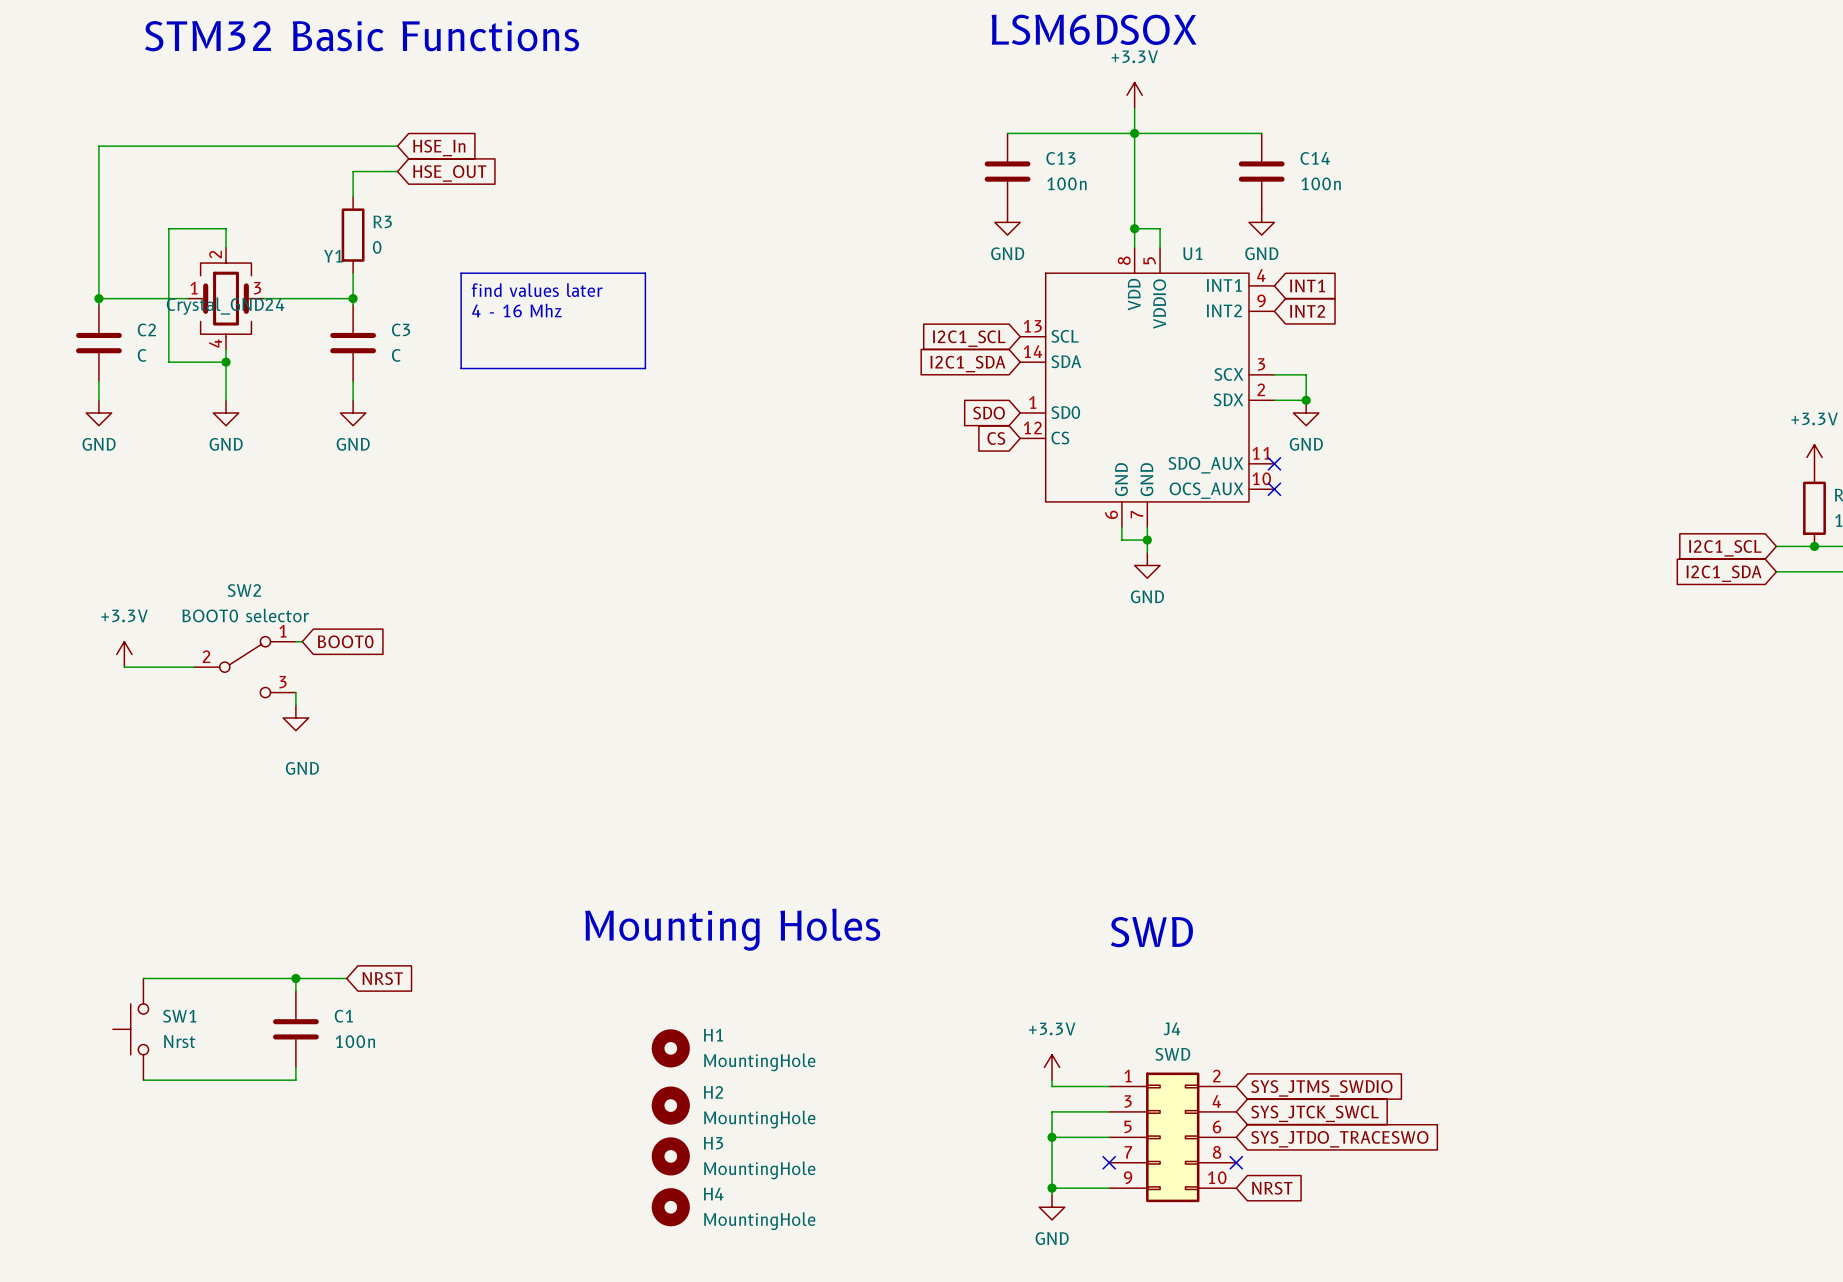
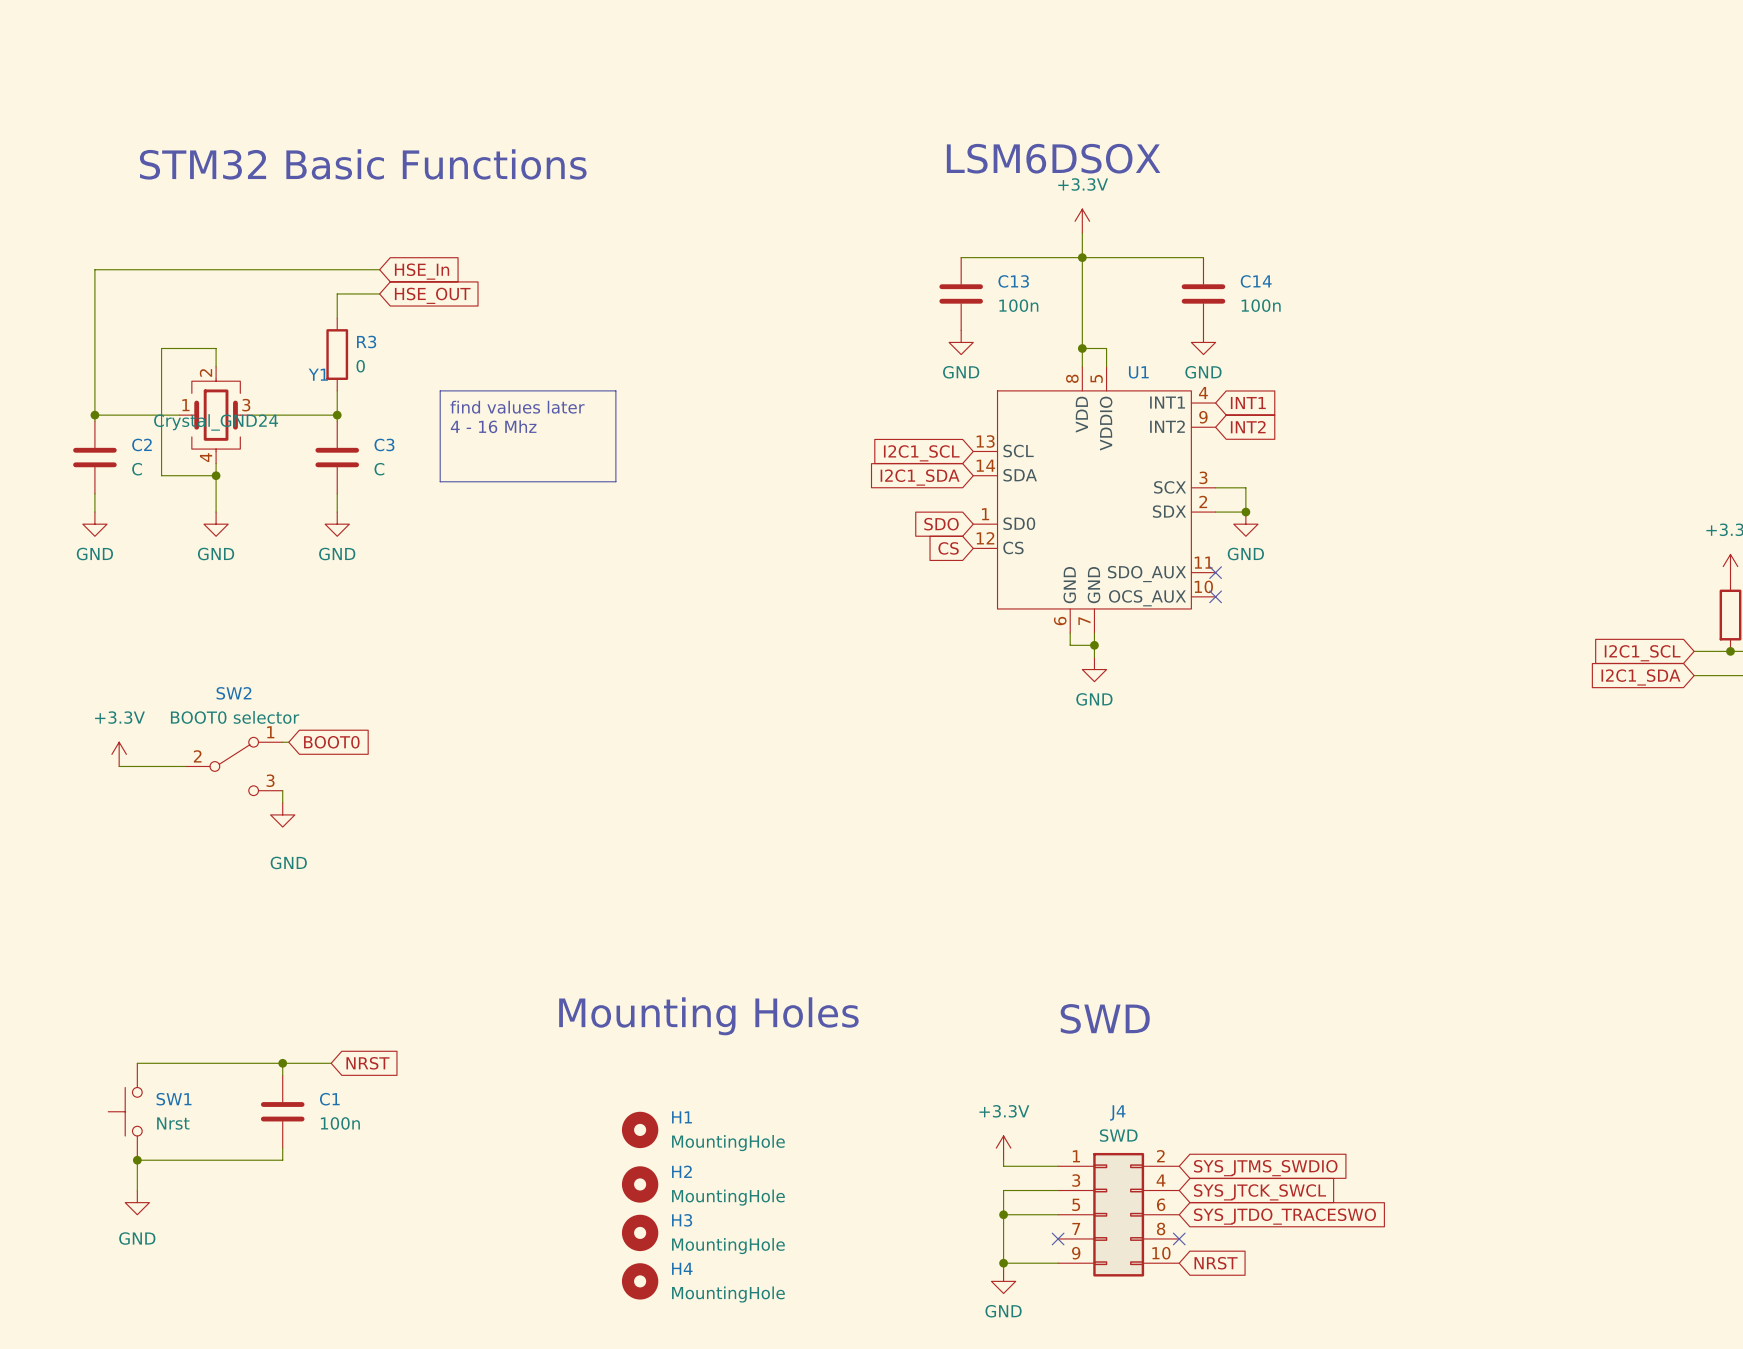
wire: none -> (137, 1160) (137, 1190)
junction: none -> (137, 1160)
power symbol: none -> GND (137, 1202)

